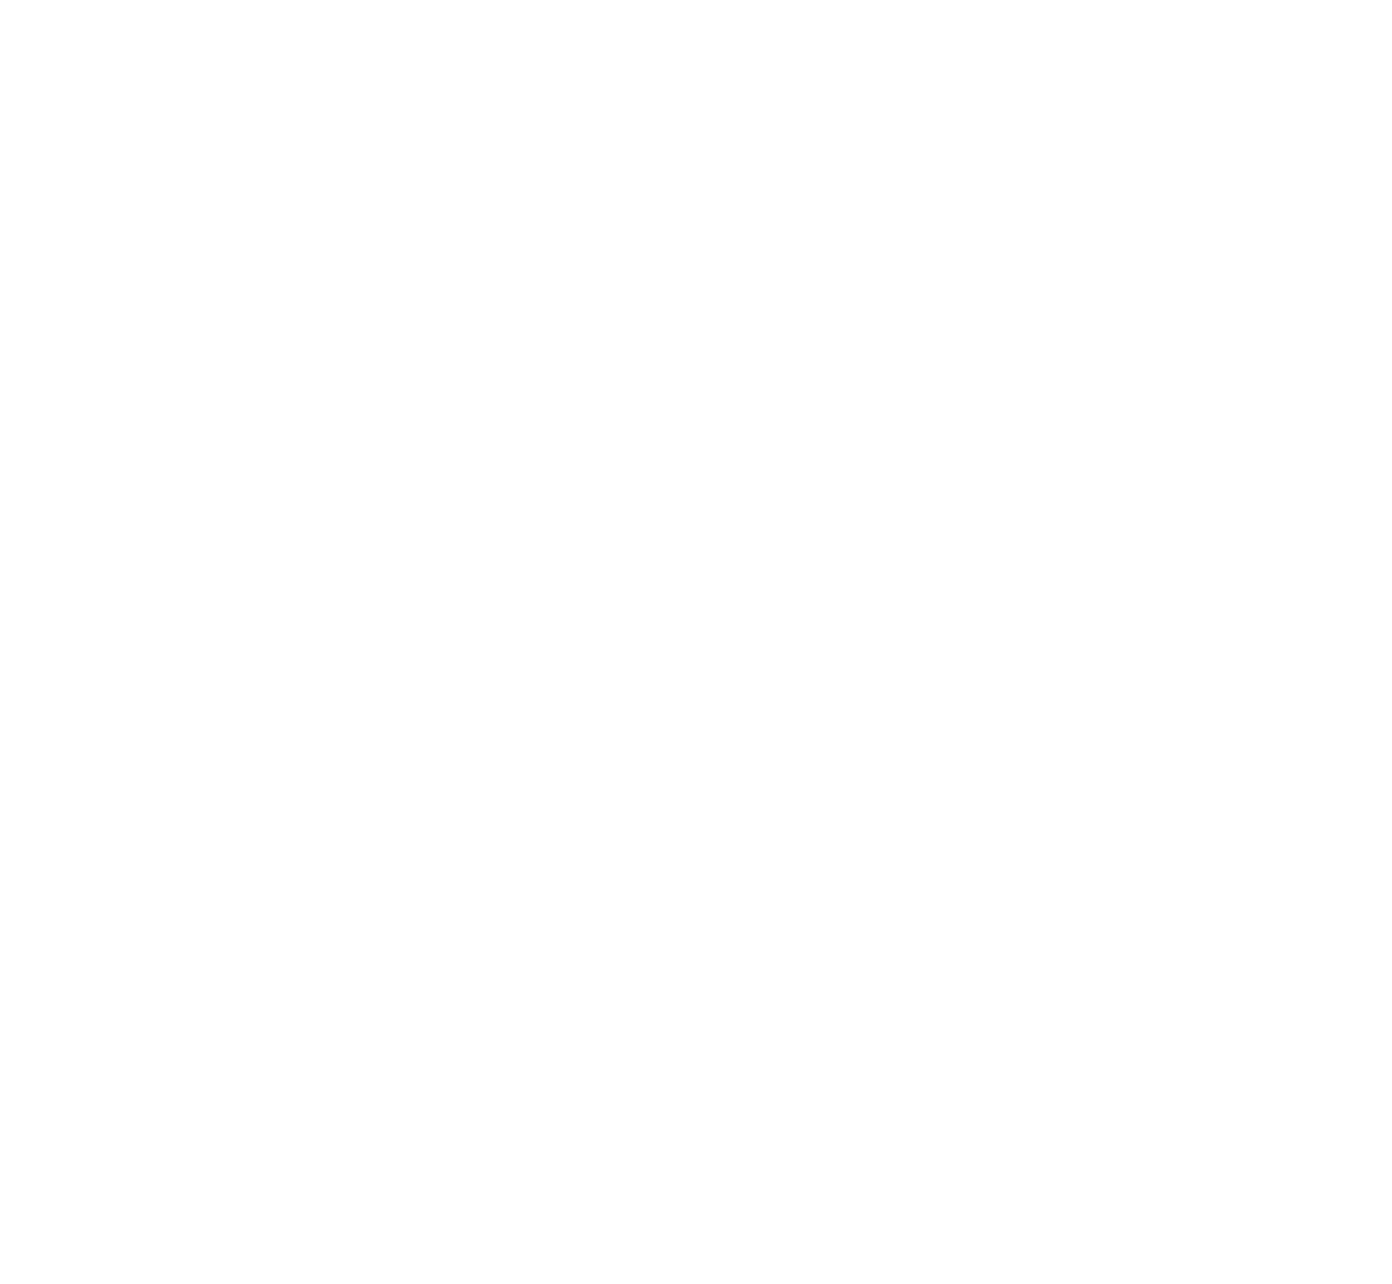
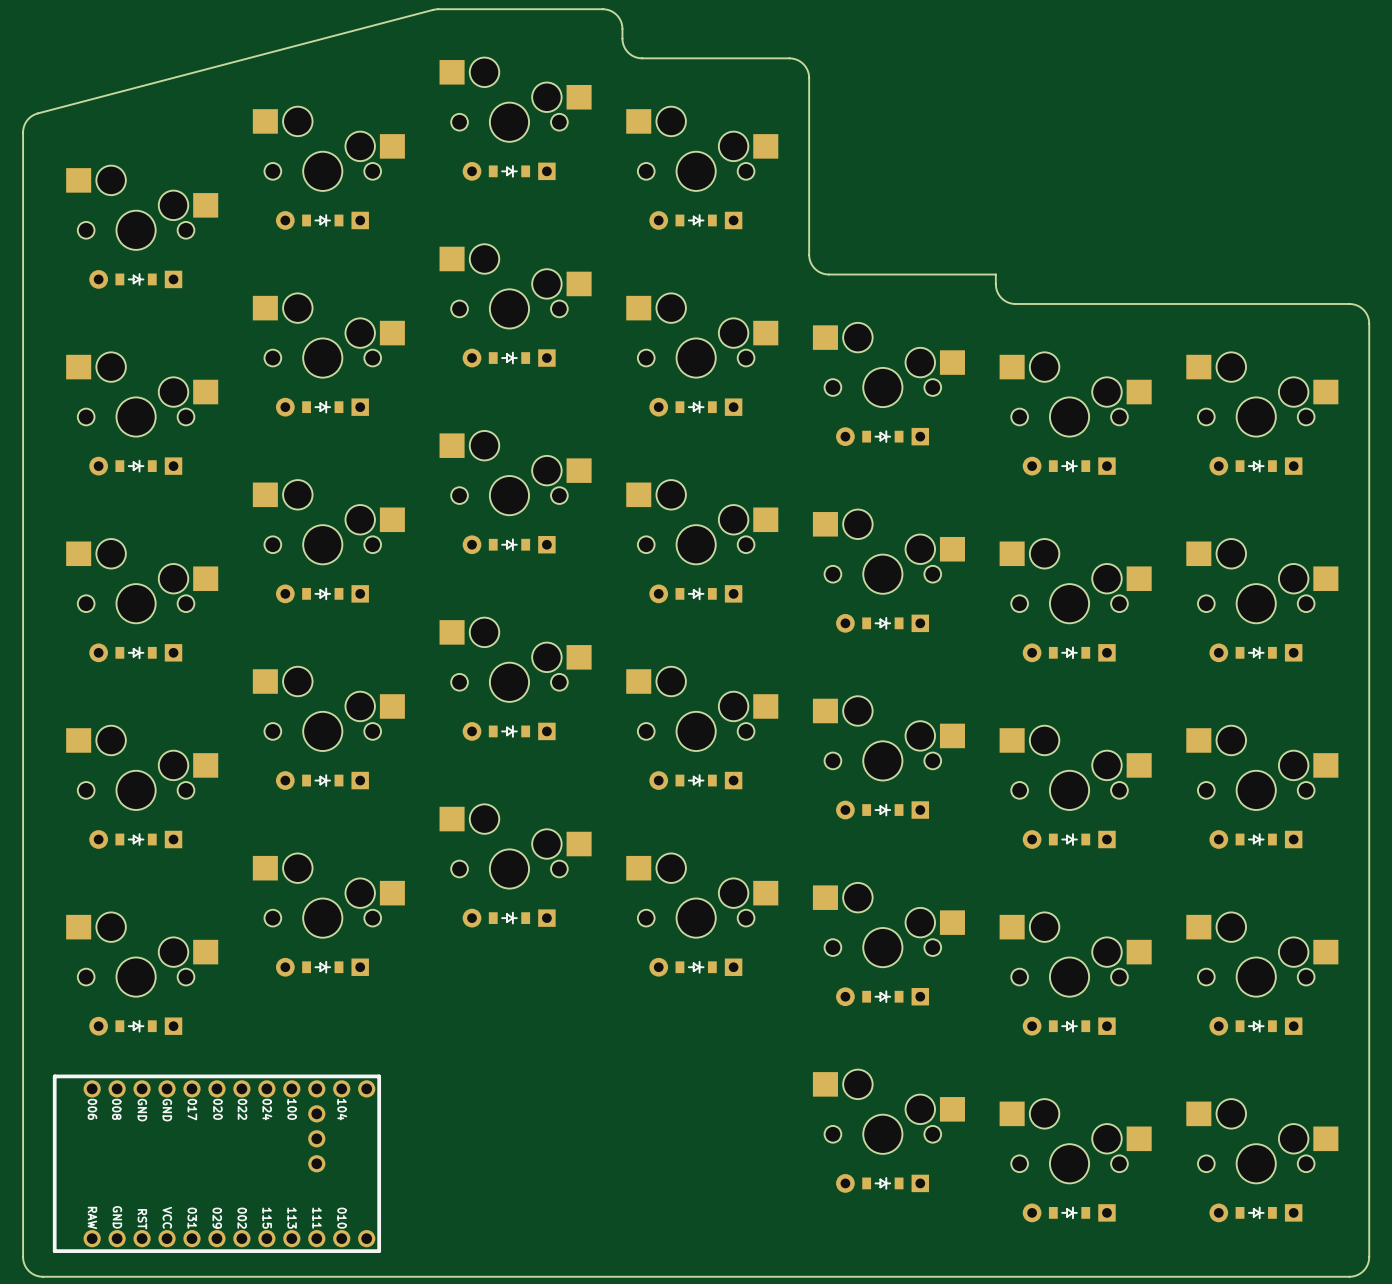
board edge: none -> (602, 9) (433, 9) (37, 113) (30, 117) (24, 124) (23, 132) (23, 1257) (25, 1266) (32, 1274) (42, 1276) (1349, 1276) (1359, 1274) (1366, 1266) (1369, 1257) (1369, 323) (1366, 313) (1359, 306) (1349, 303) (1012, 303) (1005, 301) (998, 294) (995, 274) (821, 273) (813, 266) (809, 257) (809, 78) (805, 66) (799, 60) (789, 58) (637, 57) (630, 54) (623, 46) (622, 26) (618, 16) (612, 11) (602, 9)
part: none -> (515, 99)
part: none -> (328, 148)
part: none -> (702, 148)
part: none -> (509, 171)
part: none -> (142, 207)
part: none -> (322, 220)
part: none -> (695, 220)
part: none -> (135, 279)
part: none -> (515, 286)
part: none -> (328, 335)
part: none -> (702, 335)
part: none -> (509, 358)
part: none -> (888, 364)
part: none -> (142, 394)
part: none -> (1075, 394)
part: none -> (1262, 394)
part: none -> (322, 407)
part: none -> (695, 407)
part: none -> (882, 436)
part: none -> (135, 466)
part: none -> (1069, 466)
part: none -> (1255, 466)
part: none -> (515, 473)
part: none -> (328, 522)
part: none -> (702, 522)
part: none -> (509, 544)
part: none -> (888, 551)
part: none -> (142, 581)
part: none -> (1075, 581)
part: none -> (1262, 581)
part: none -> (322, 593)
part: none -> (695, 593)
part: none -> (882, 623)
part: none -> (135, 652)
part: none -> (1069, 652)
part: none -> (1255, 652)
part: none -> (515, 659)
part: none -> (328, 708)
part: none -> (702, 708)
part: none -> (509, 731)
part: none -> (888, 738)
part: none -> (142, 767)
part: none -> (1075, 767)
part: none -> (1262, 767)
part: none -> (322, 780)
part: none -> (695, 780)
part: none -> (882, 810)
part: none -> (135, 839)
part: none -> (1069, 839)
part: none -> (1255, 839)
part: none -> (515, 846)
part: none -> (328, 895)
part: none -> (702, 895)
part: none -> (509, 918)
part: none -> (888, 925)
part: none -> (142, 954)
part: none -> (1075, 954)
part: none -> (1262, 954)
part: none -> (322, 967)
part: none -> (695, 967)
part: none -> (882, 996)
part: none -> (135, 1026)
part: none -> (1069, 1026)
part: none -> (1255, 1026)
part: none -> (888, 1111)
part: none -> (1075, 1141)
part: none -> (1262, 1141)
part: none -> (216, 1163)
part: none -> (882, 1183)
part: none -> (1069, 1212)
part: none -> (1255, 1212)

